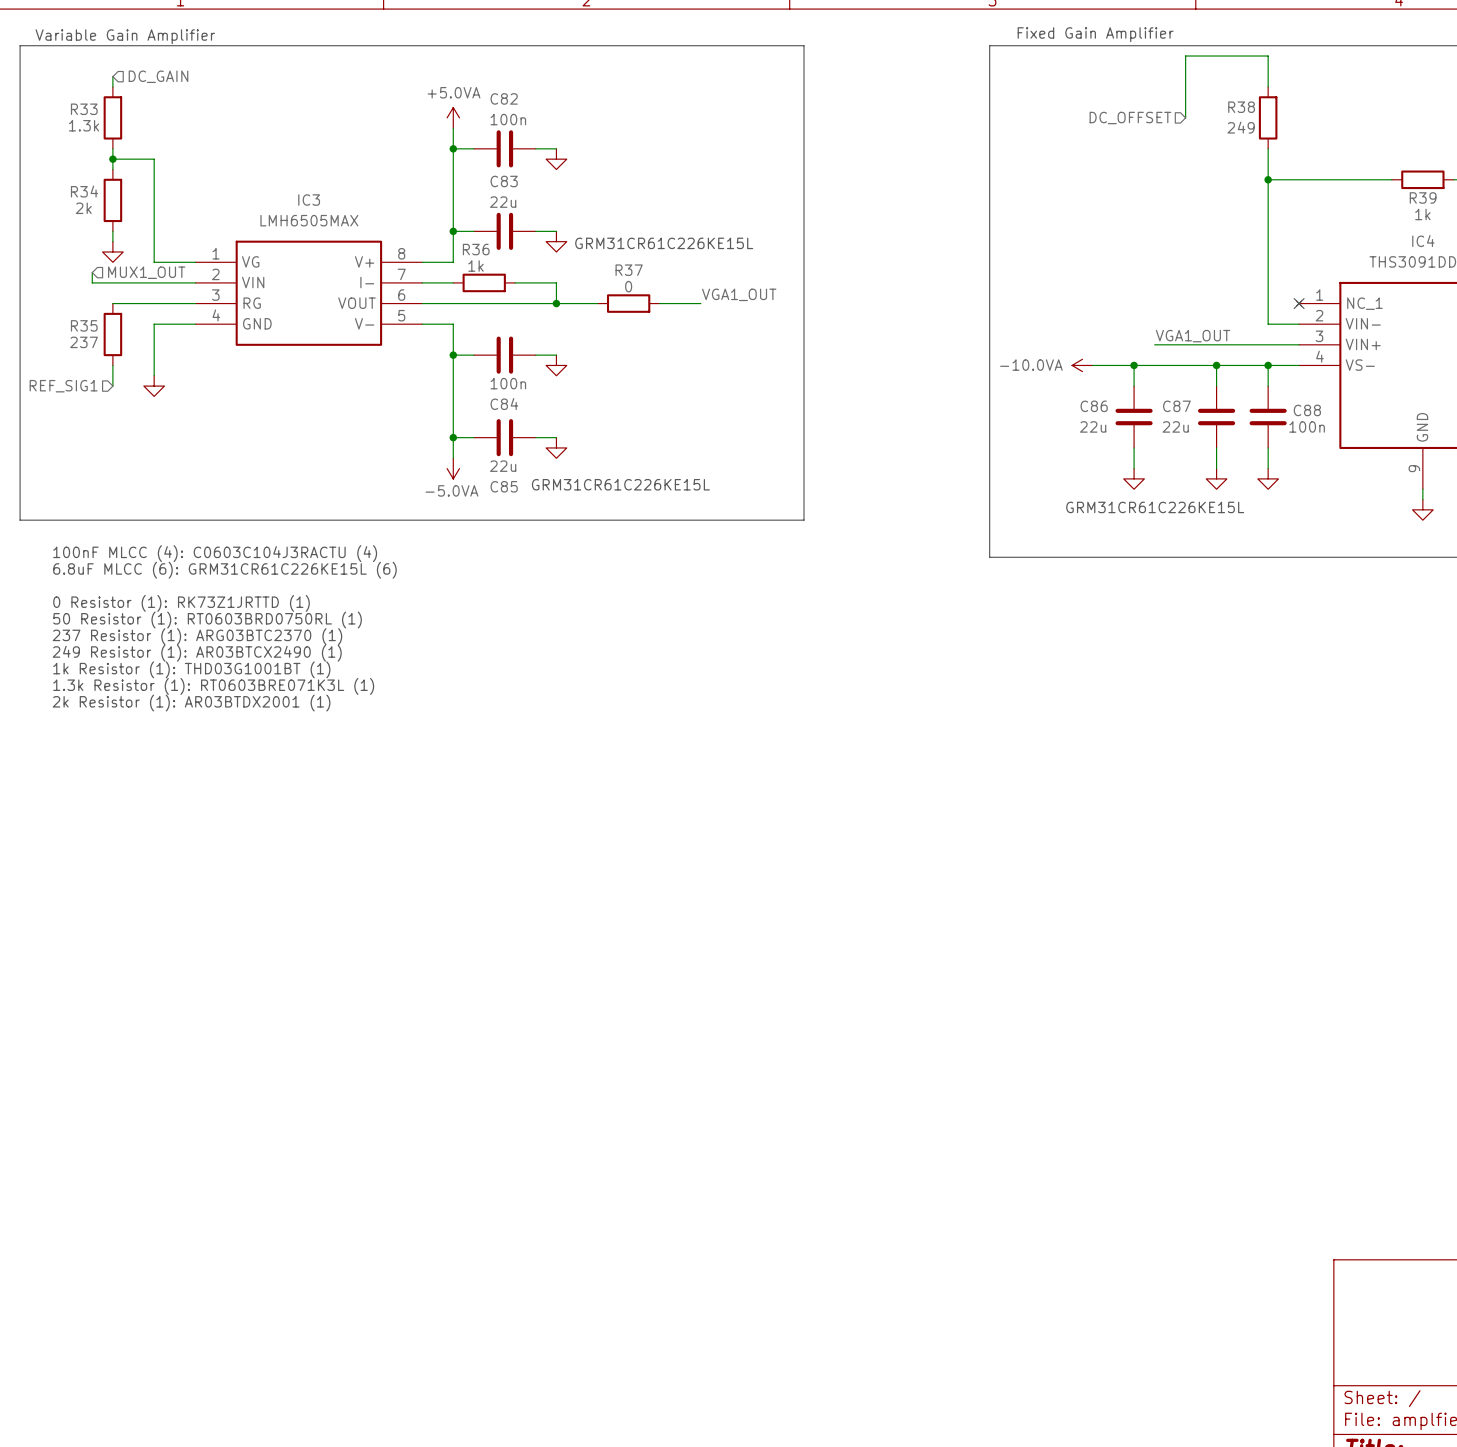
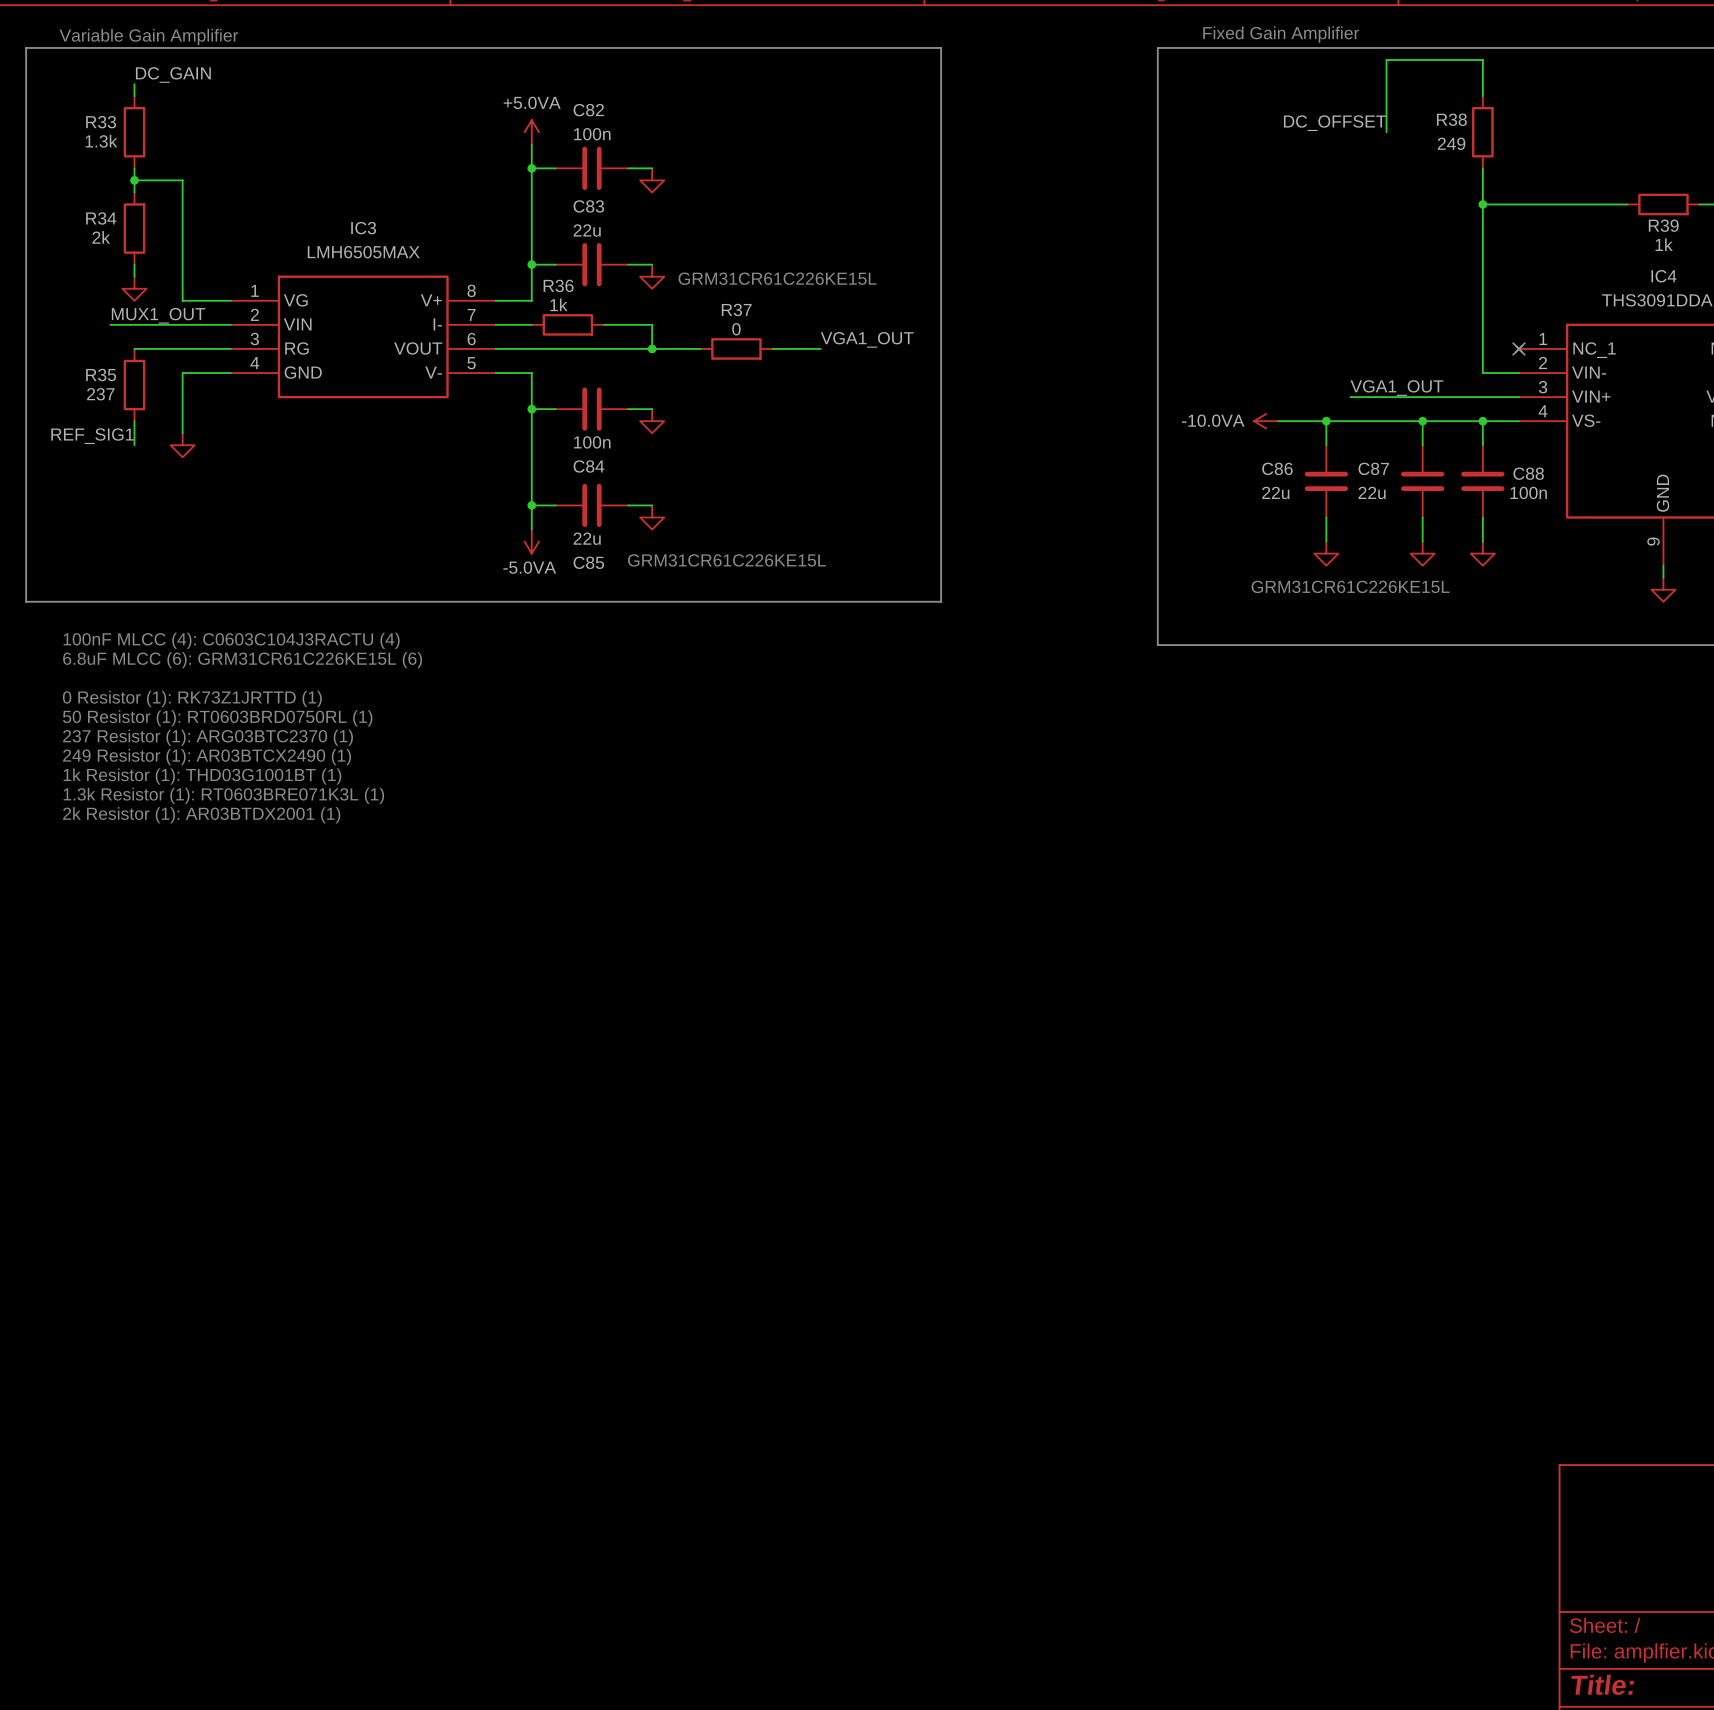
label: none -> DC_GAIN (173, 74)
hierarchical label: DC_GAIN (158, 76) -> none
label: none -> DC_OFFSET (1335, 123)
hierarchical label: DC_OFFSET (1130, 118) -> none
wire: (92, 272) (92, 282) -> none
hierarchical label: MUX1_OUT (146, 272) -> none
label: none -> MUX1_OUT (158, 315)
label: none -> REF_SIG1 (92, 436)
hierarchical label: REF_SIG1 (63, 386) -> none

